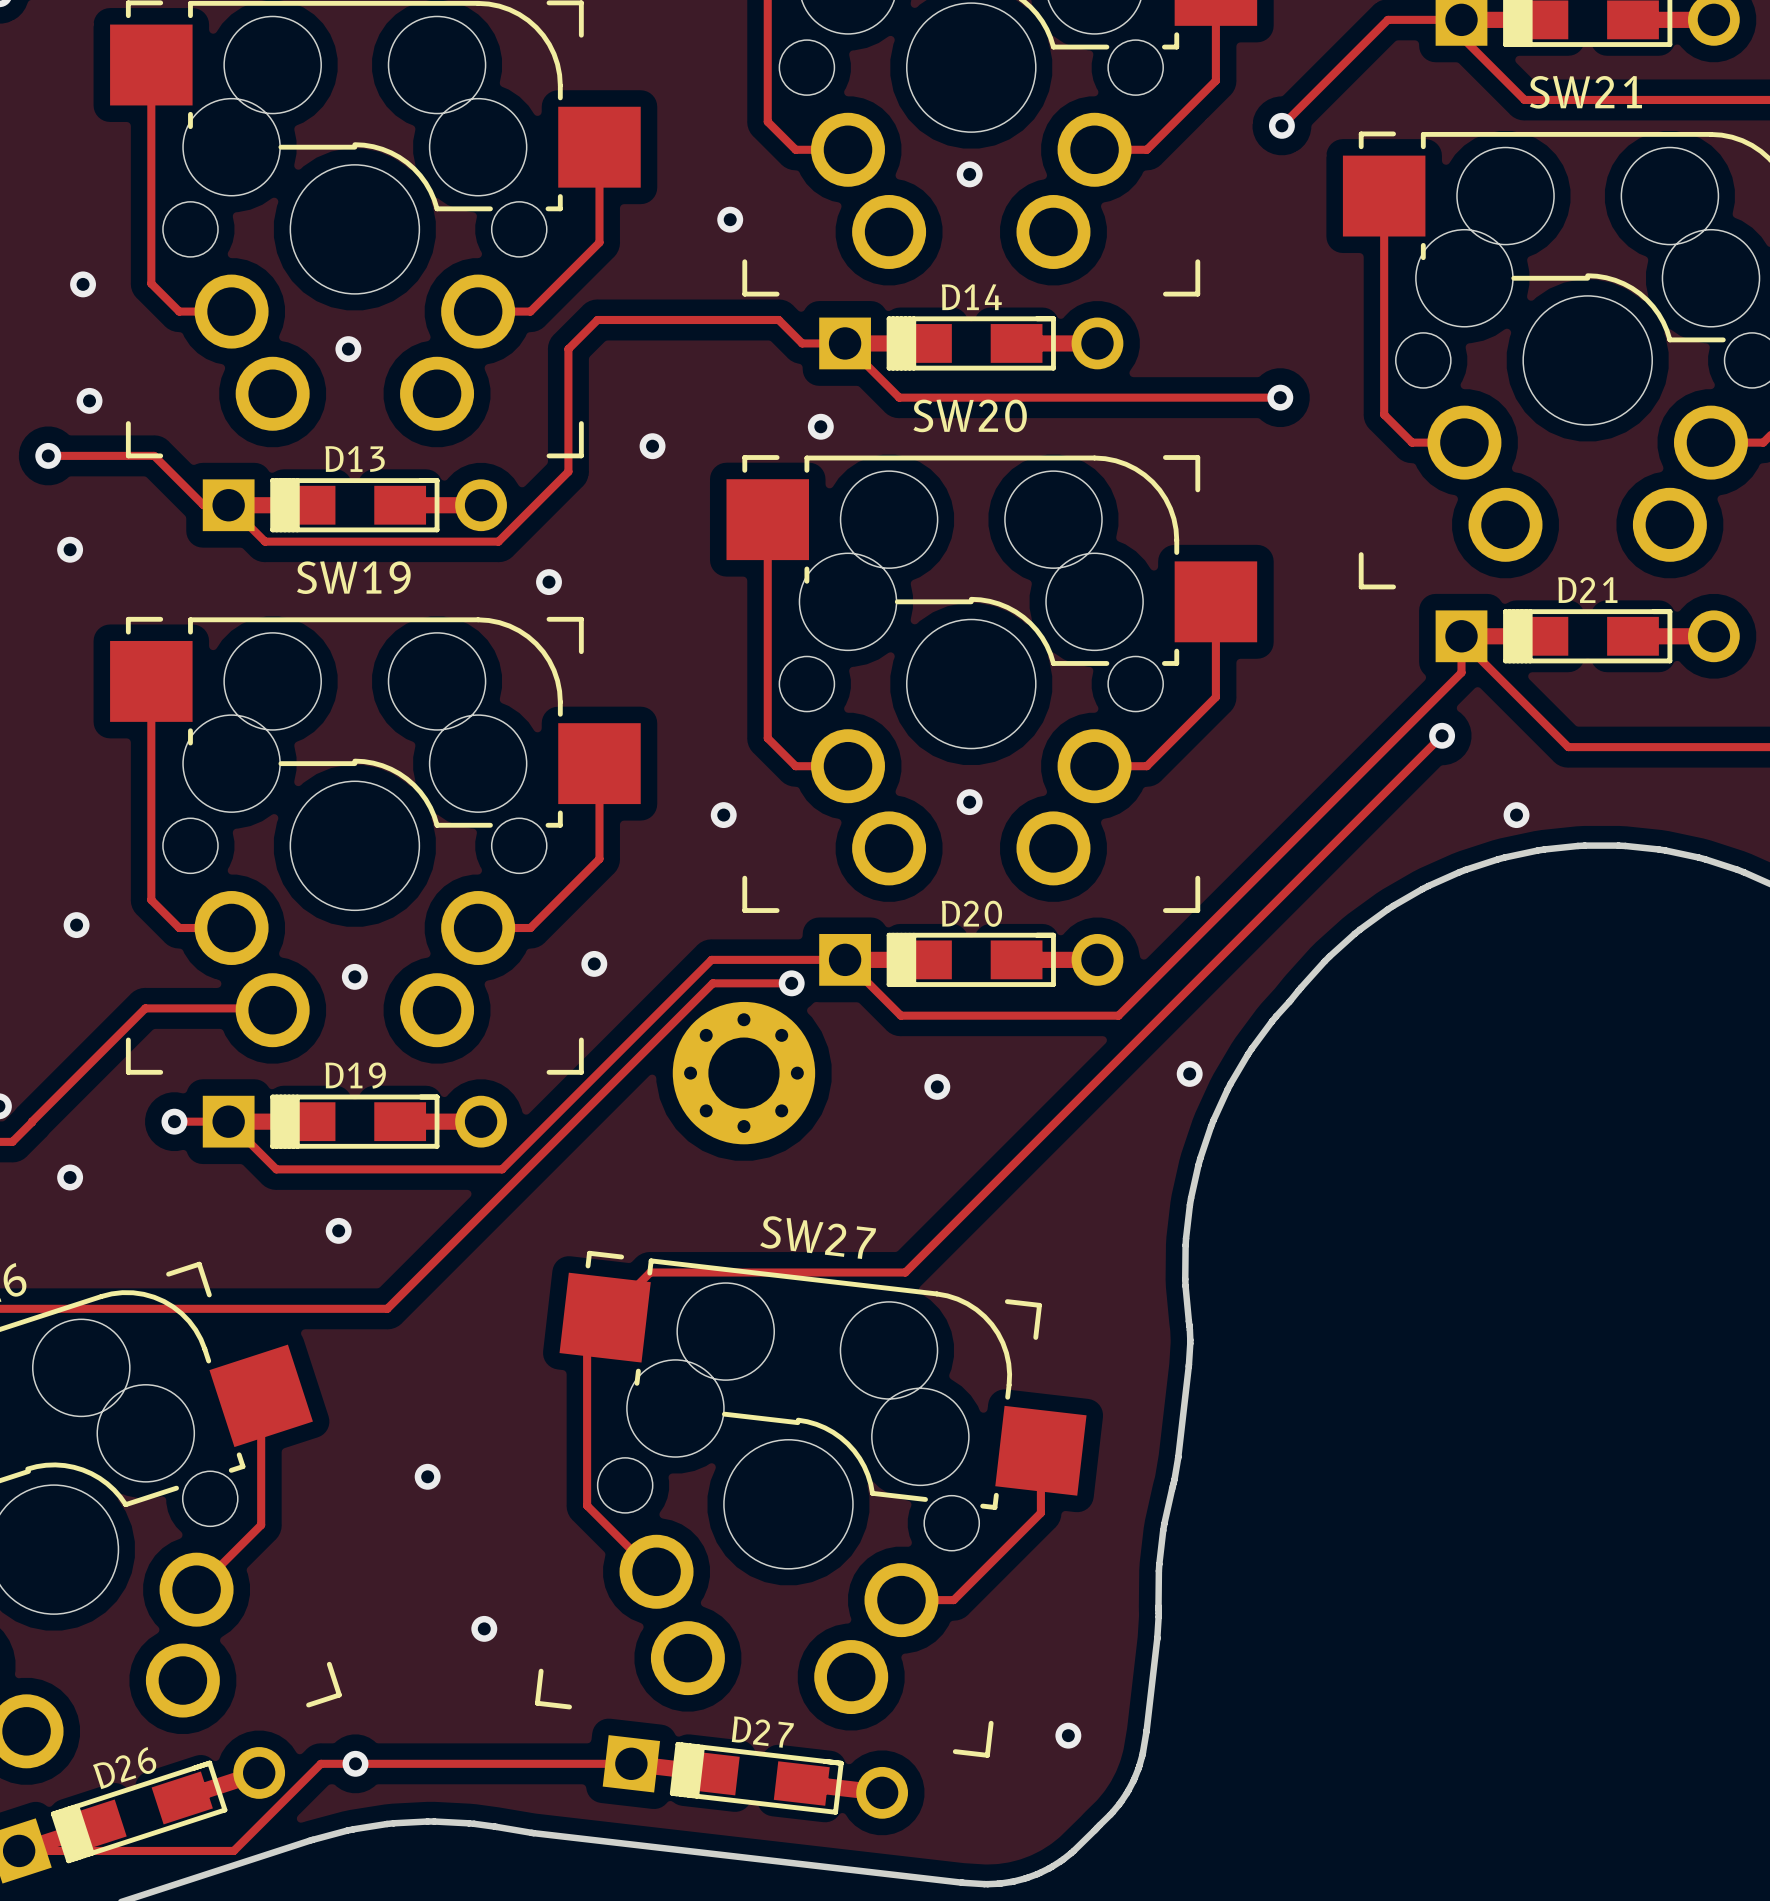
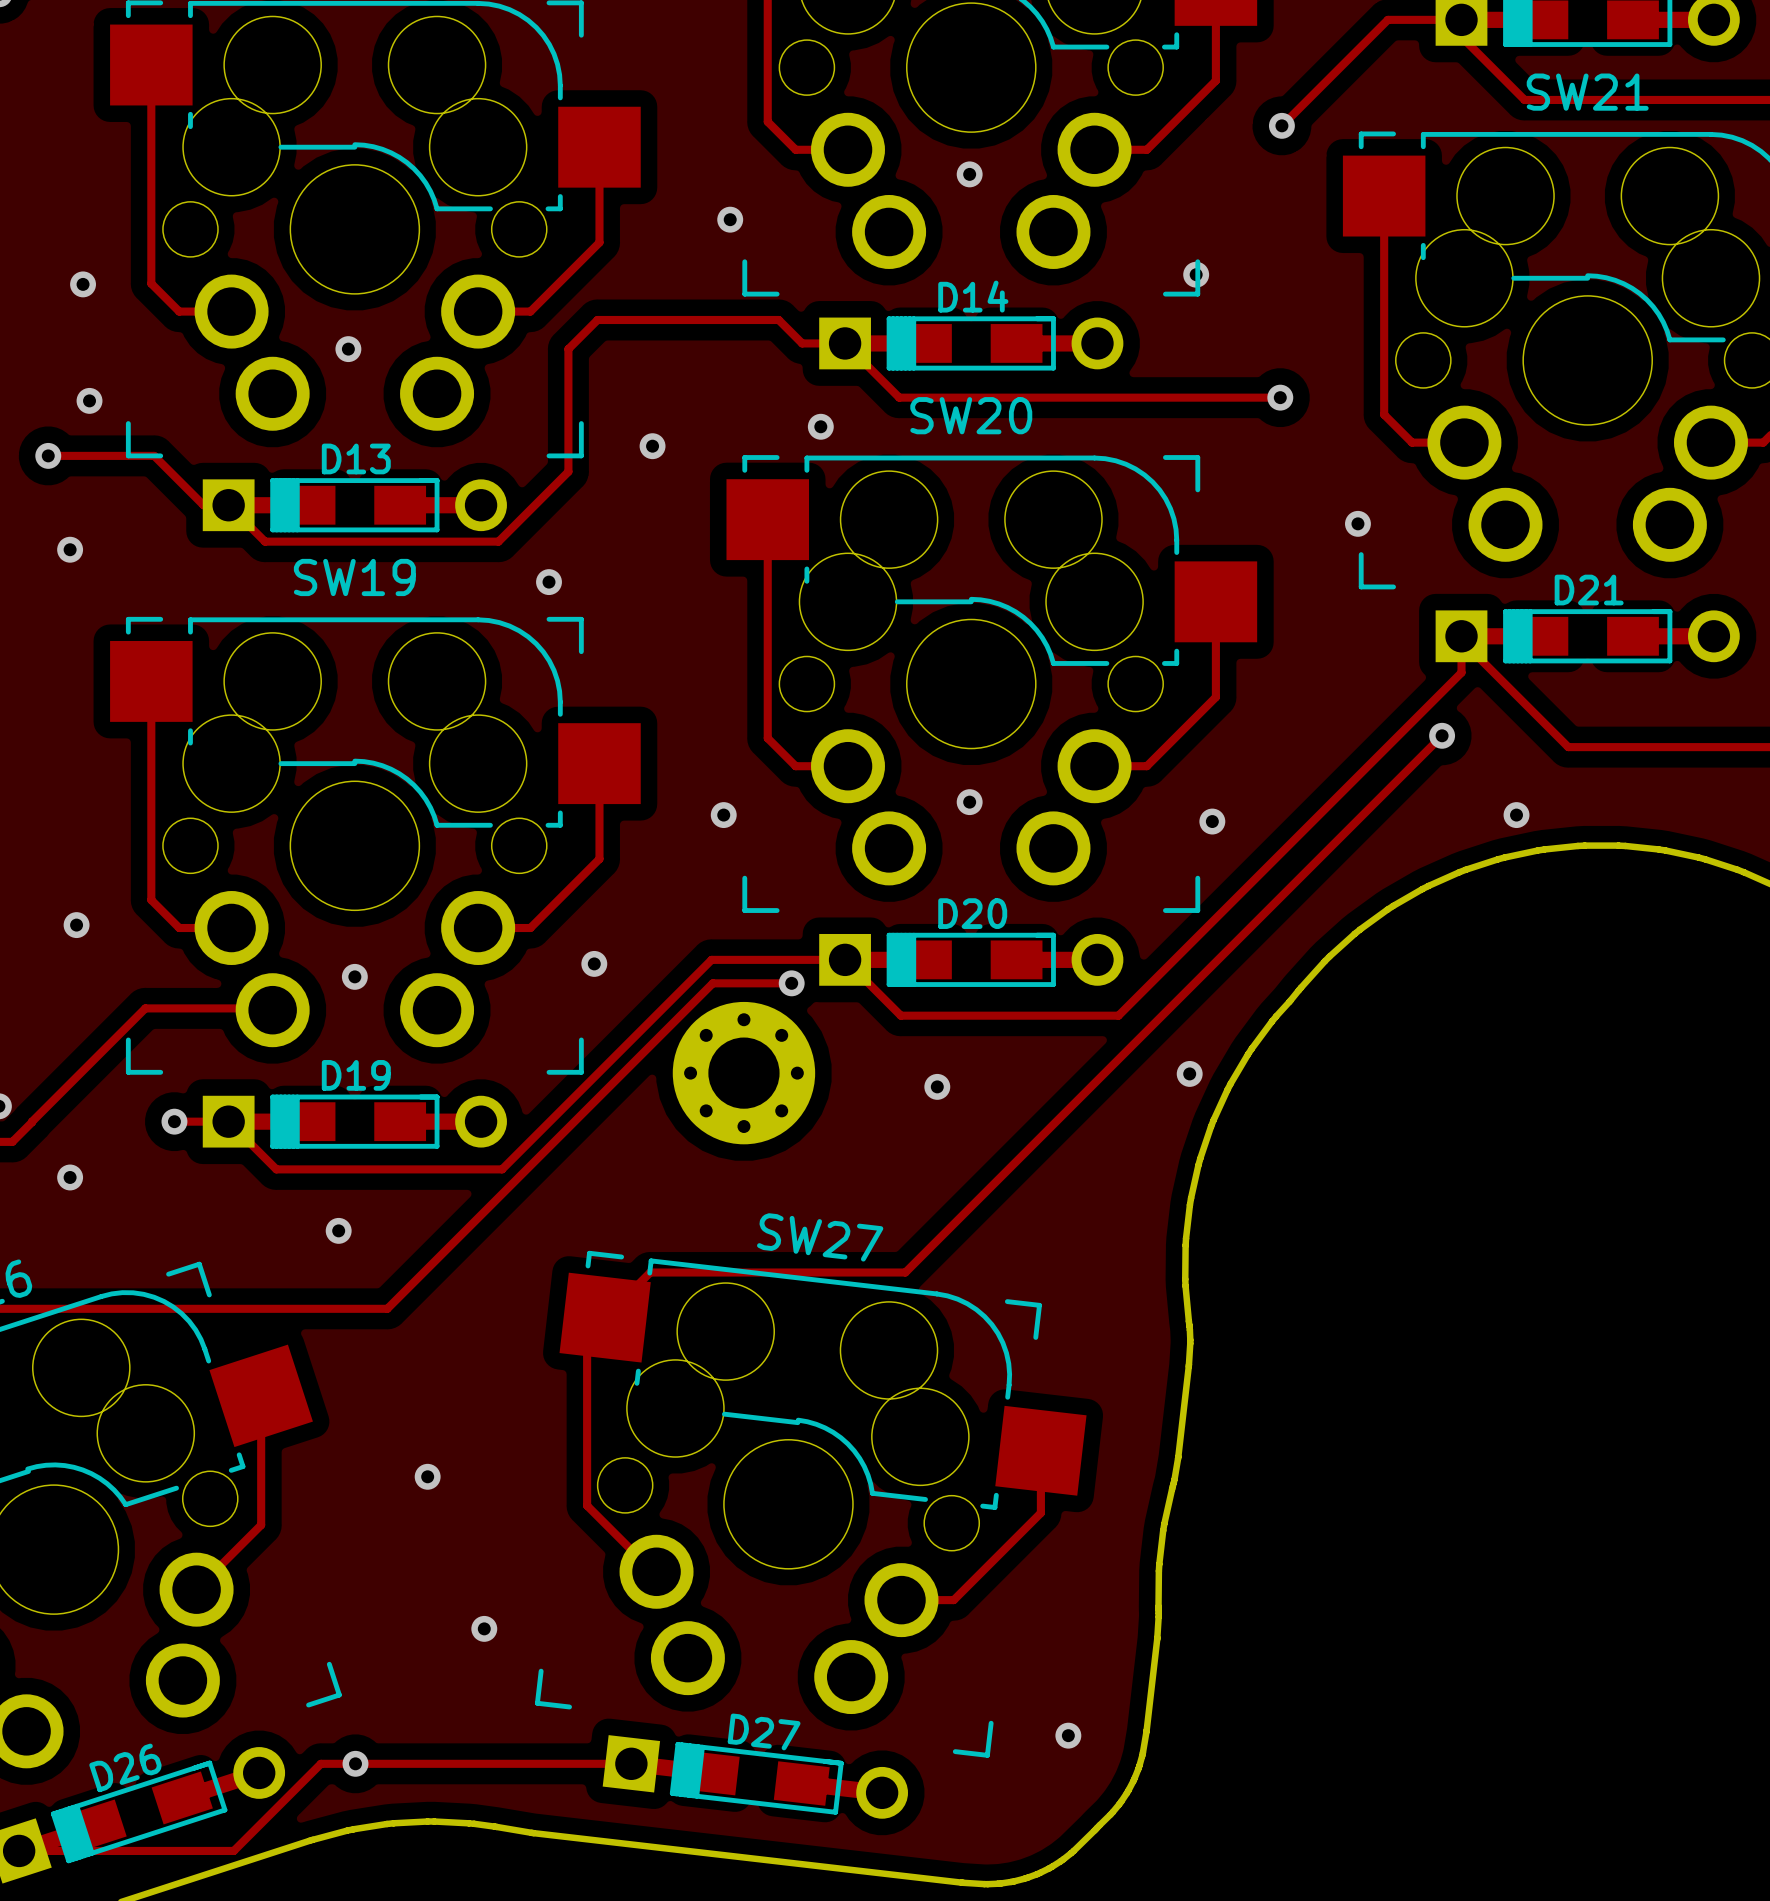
via: none -> (1196, 274)
via: none -> (1357, 523)
via: none -> (1212, 821)

